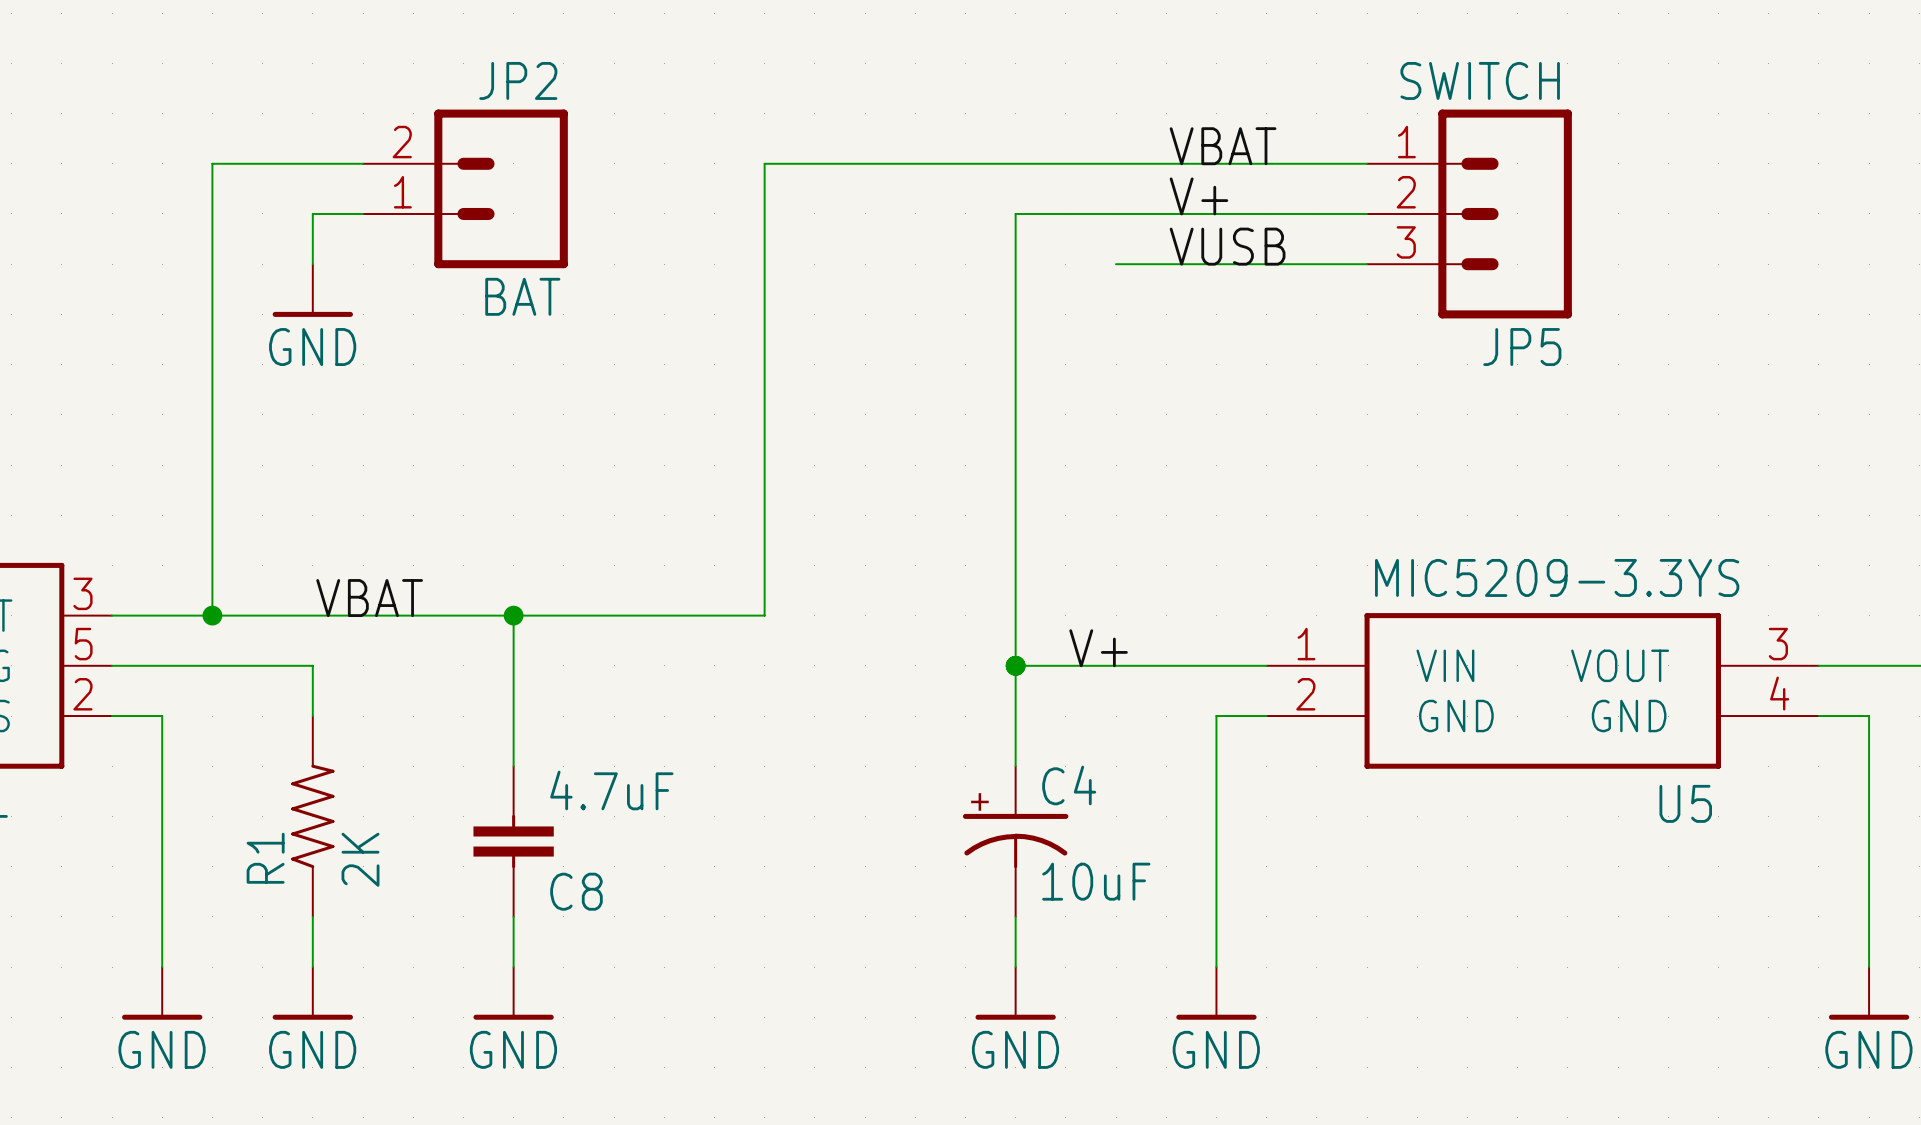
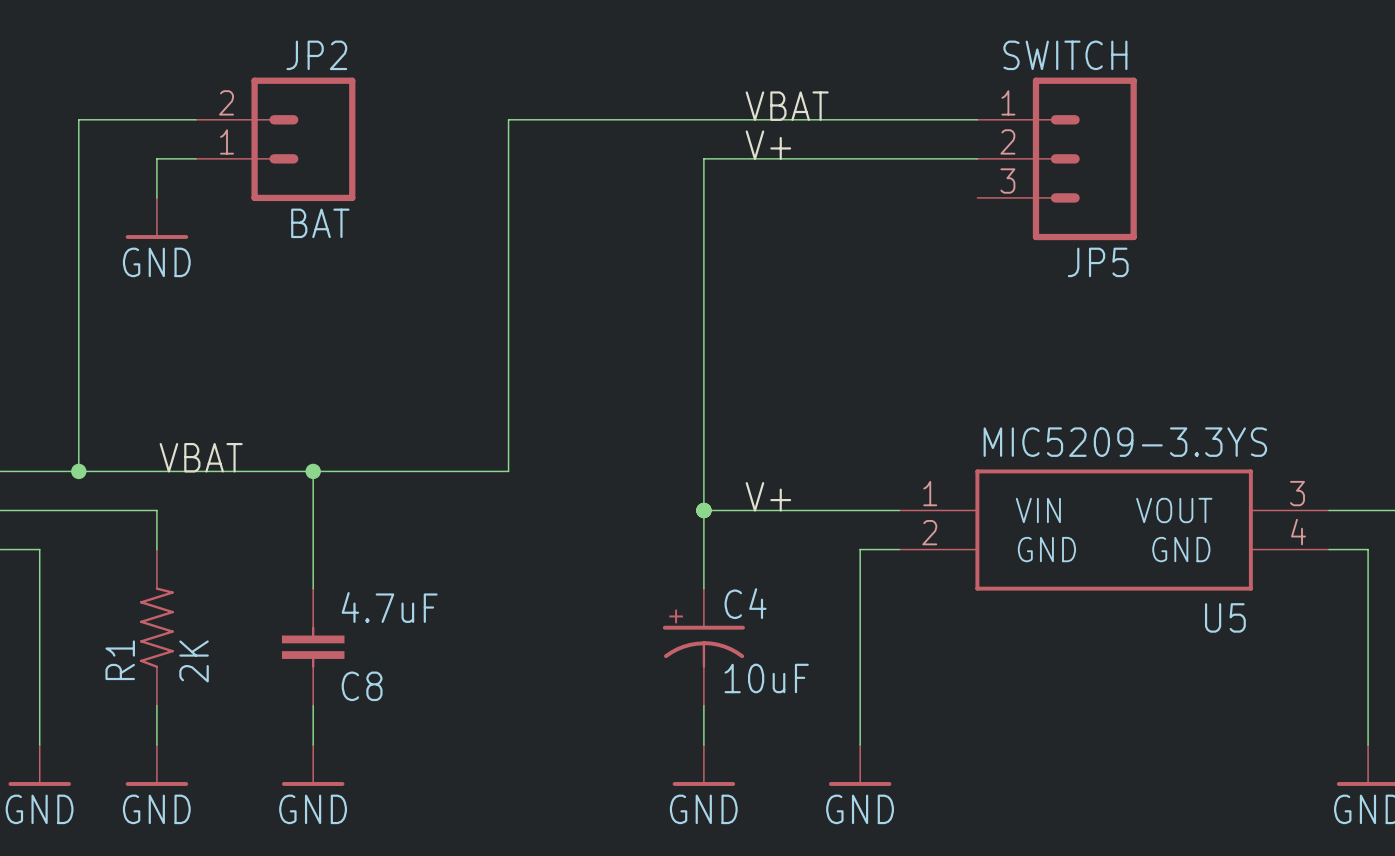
label position: VBAT (1223, 146) -> VBAT (787, 106)
label position: V+ (1198, 196) -> V+ (768, 145)
label: VUSB (1227, 246) -> none
wire: (1116, 264) (1367, 264) -> none

